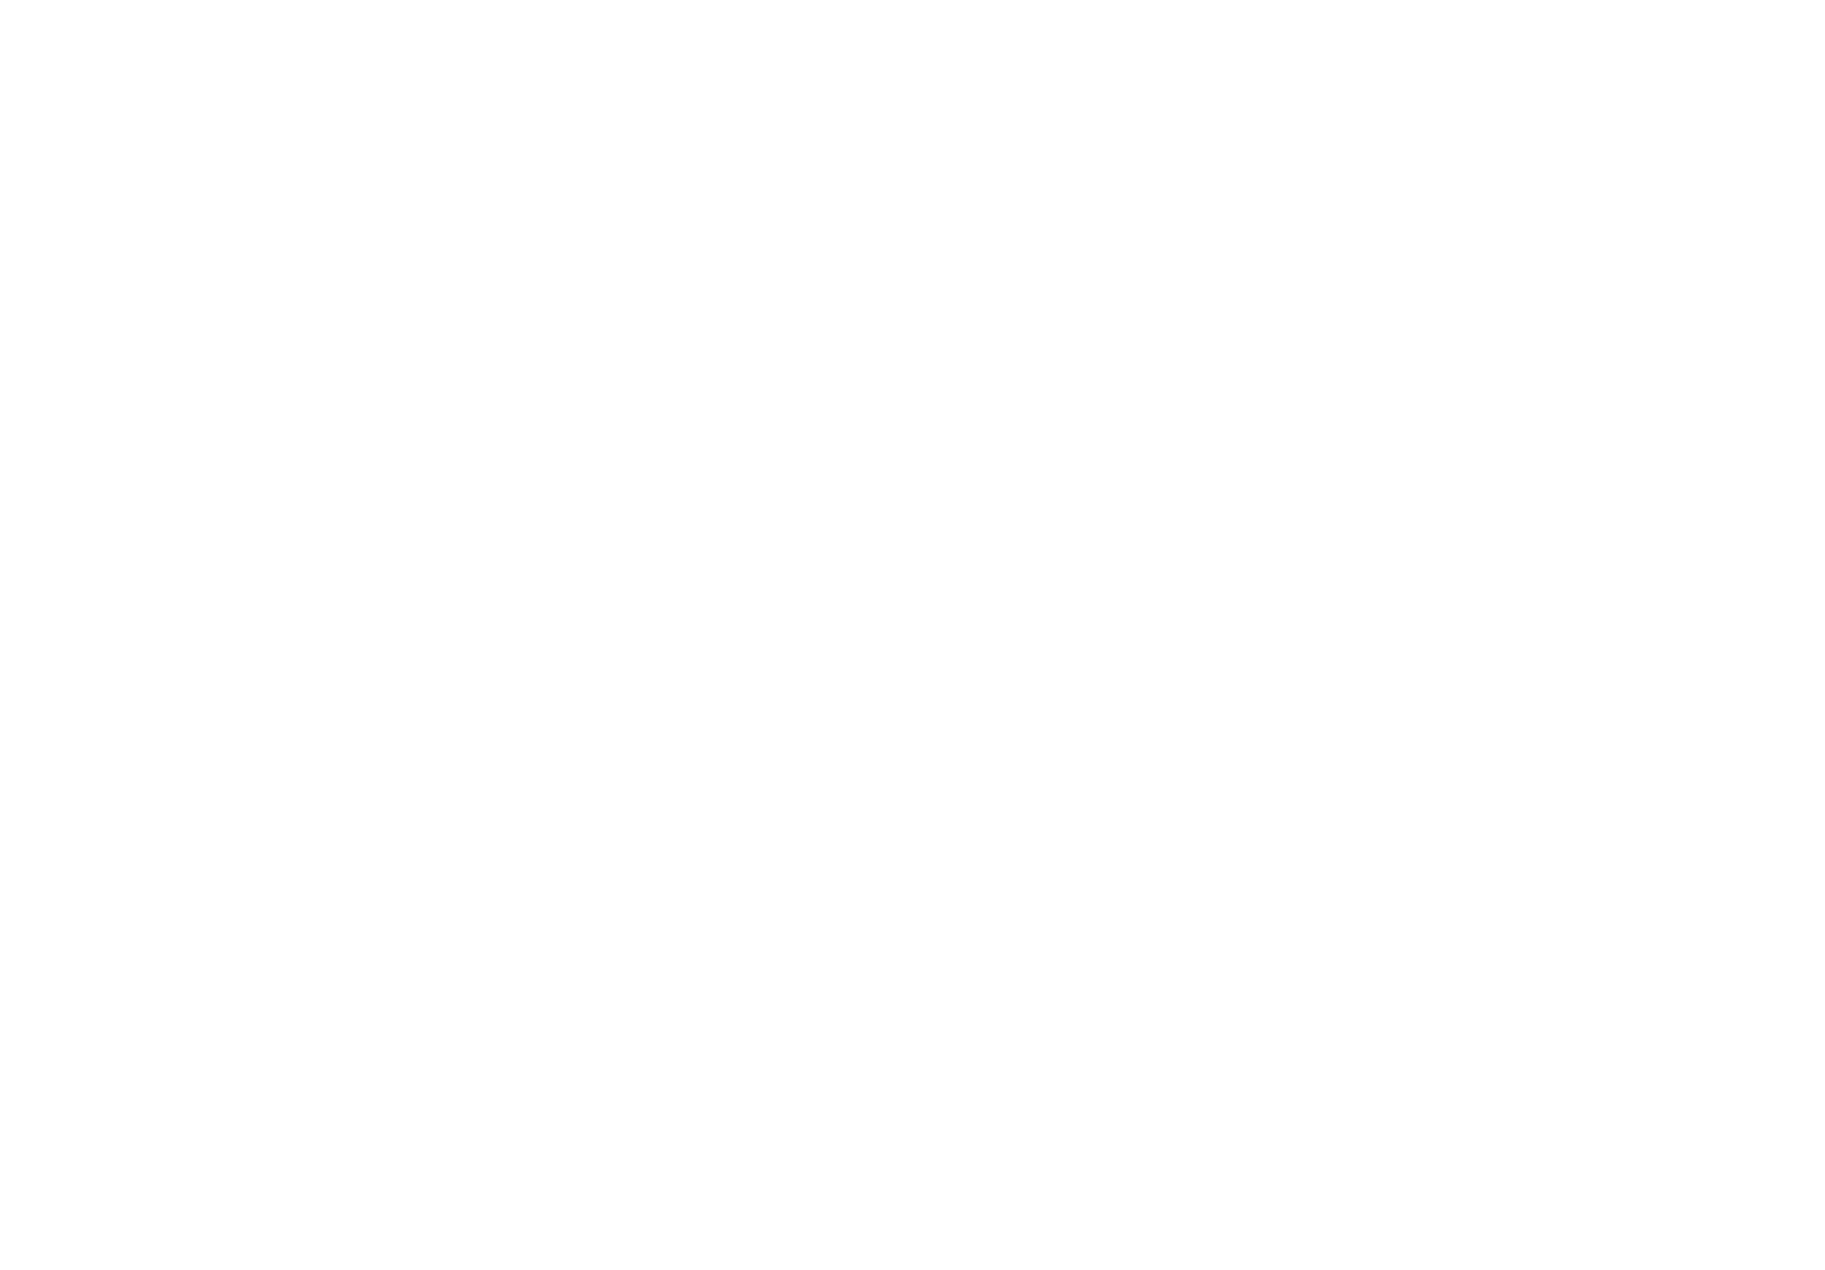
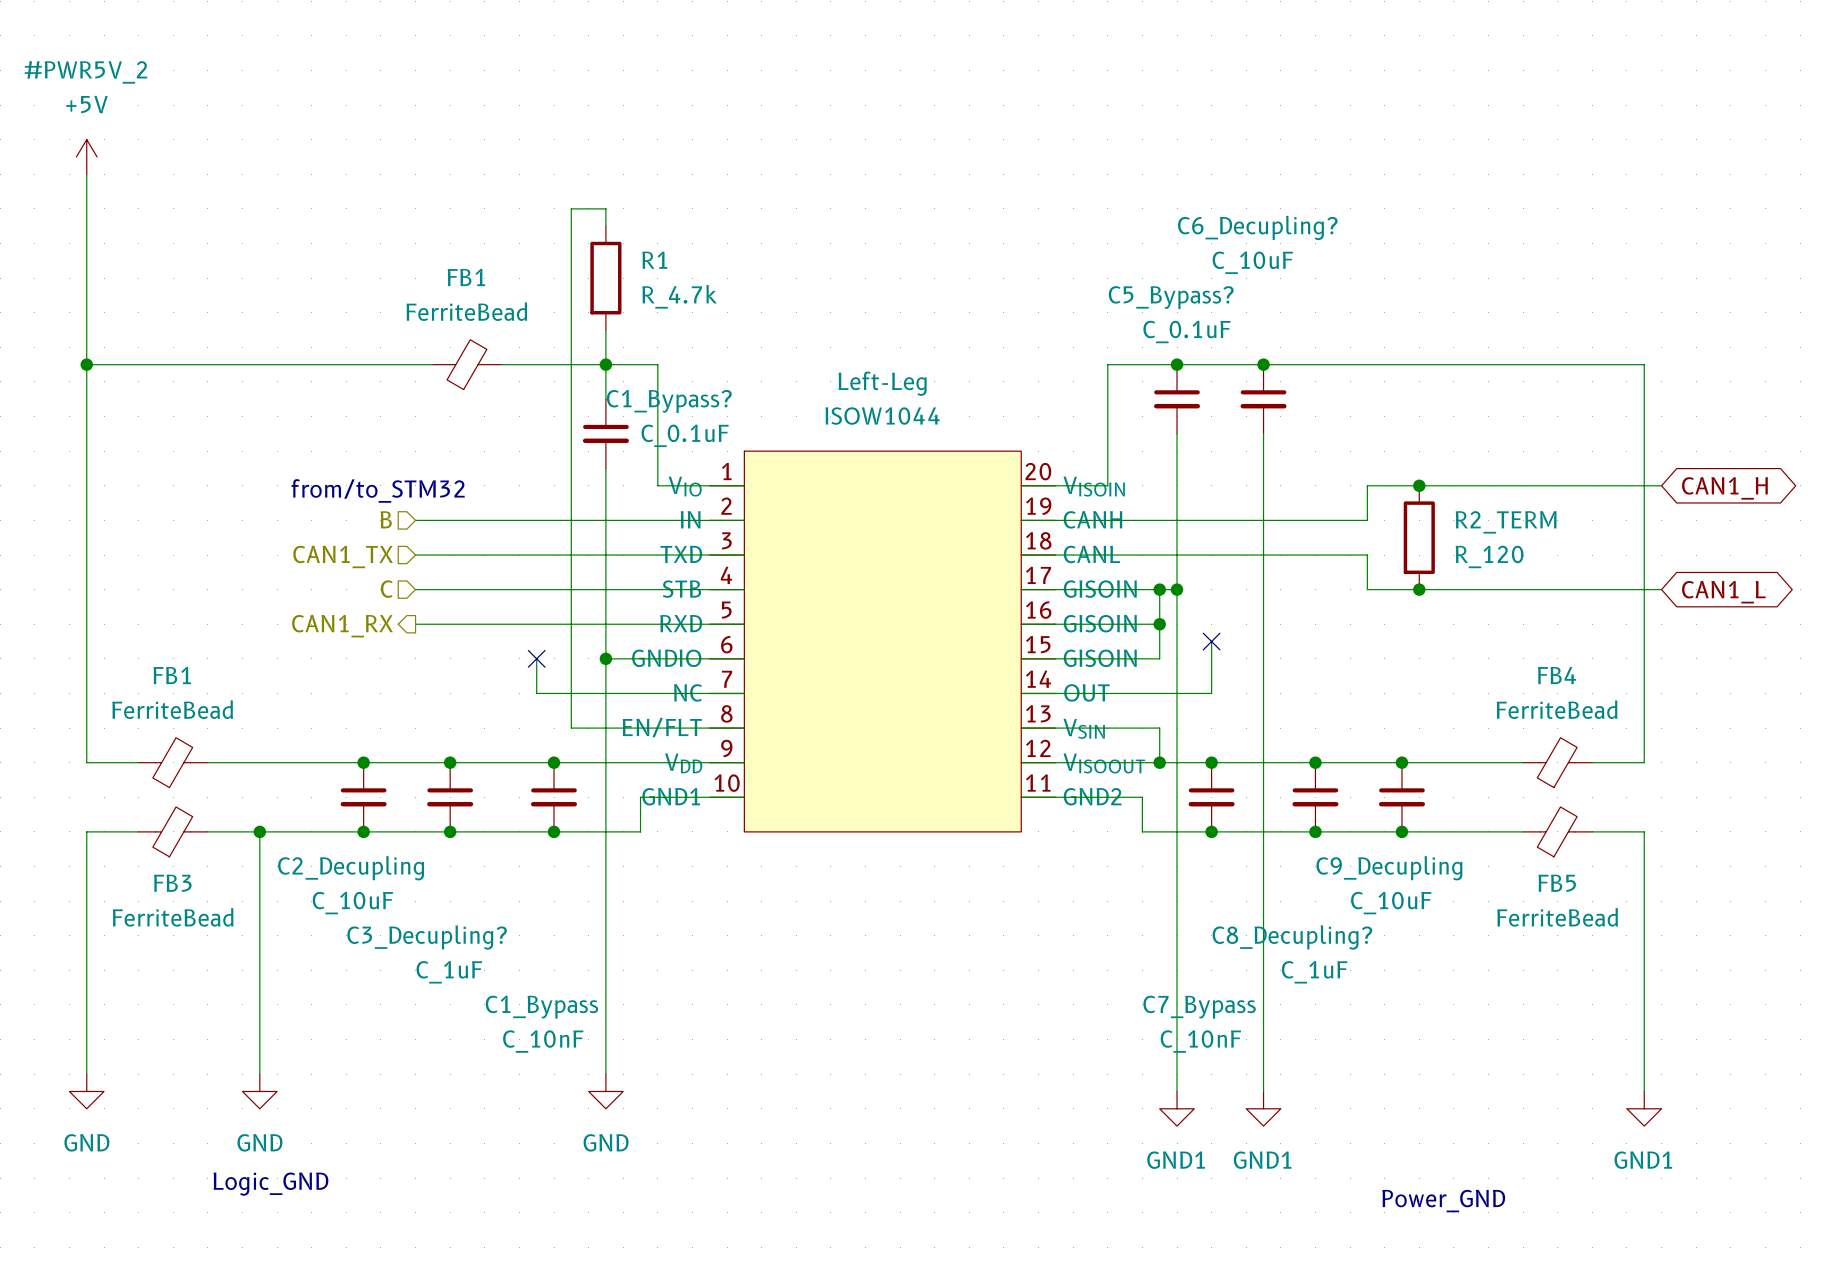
#PWR5V_2: none -> +5V (86, 156)
wire: none -> (86, 174) (86, 762) (138, 762)
wire: none -> (605, 226) (605, 208) (571, 208) (571, 728) (744, 728)
R1: none -> R_4.7k (605, 278)
wire: none -> (605, 330) (605, 399)
wire: none -> (86, 364) (432, 364)
junction: none -> (86, 364)
FB1: none -> FerriteBead (467, 364)
wire: none -> (502, 364) (657, 364) (657, 485) (744, 485)
junction: none -> (605, 364)
junction: none -> (1177, 364)
junction: none -> (1263, 364)
C5_Bypass?: none -> C_0.1uF (1177, 399)
C6_Decupling?: none -> C_10uF (1263, 399)
C1_Bypass?: none -> C_0.1uF (605, 433)
wire: none -> (1177, 433) (1177, 1091)
wire: none -> (1263, 433) (1263, 1091)
wire: none -> (605, 468) (605, 1074)
wire: none -> (1021, 485) (1107, 485) (1107, 364) (1644, 364) (1644, 762) (1592, 762)
junction: none -> (1419, 485)
wire: none -> (1661, 485) (1367, 485) (1367, 520) (1021, 520)
global label: none -> CAN1_H (1724, 488)
text: none -> from/to_STM32 (378, 490)
hierarchical label: none -> B (386, 519)
wire: none -> (415, 520) (744, 520)
R2_TERM: none -> R_120 (1419, 537)
hierarchical label: none -> CAN1_TX (343, 556)
wire: none -> (415, 555) (744, 555)
wire: none -> (1021, 555) (1367, 555) (1367, 589) (1661, 589)
hierarchical label: none -> C (386, 589)
wire: none -> (415, 589) (744, 589)
wire: none -> (1021, 589) (1177, 589)
wire: none -> (1159, 589) (1159, 658) (1021, 658)
junction: none -> (1159, 589)
junction: none -> (1177, 589)
junction: none -> (1419, 589)
global label: none -> CAN1_L (1723, 592)
hierarchical label: none -> CAN1_RX (342, 626)
wire: none -> (415, 624) (744, 624)
wire: none -> (1021, 624) (1159, 624)
junction: none -> (1159, 624)
Left-Leg: none -> ISOW1044 (882, 641)
wire: none -> (1211, 641) (1211, 693) (1021, 693)
no-connect mark: none -> (1211, 641)
wire: none -> (536, 658) (536, 693) (744, 693)
no-connect mark: none -> (536, 658)
wire: none -> (605, 658) (744, 658)
junction: none -> (605, 658)
wire: none -> (1021, 728) (1159, 728) (1159, 762)
FB1: none -> FerriteBead (173, 762)
wire: none -> (207, 762) (744, 762)
junction: none -> (363, 762)
junction: none -> (450, 762)
junction: none -> (554, 762)
wire: none -> (1021, 762) (1523, 762)
junction: none -> (1159, 762)
junction: none -> (1211, 762)
junction: none -> (1315, 762)
junction: none -> (1401, 762)
FB4: none -> FerriteBead (1557, 762)
C2_Decupling: none -> C_10uF (363, 797)
C3_Decupling?: none -> C_1uF (450, 797)
C1_Bypass: none -> C_10nF (554, 797)
wire: none -> (744, 797) (640, 797) (640, 831) (207, 831)
wire: none -> (1021, 797) (1142, 797) (1142, 831) (1523, 831)
C7_Bypass: none -> C_10nF (1211, 797)
C8_Decupling?: none -> C_1uF (1315, 797)
C9_Decupling: none -> C_10uF (1401, 797)
wire: none -> (138, 831) (86, 831) (86, 1074)
FB3: none -> FerriteBead (173, 831)
wire: none -> (259, 831) (259, 1074)
junction: none -> (259, 831)
junction: none -> (363, 831)
junction: none -> (450, 831)
junction: none -> (554, 831)
junction: none -> (1211, 831)
junction: none -> (1315, 831)
junction: none -> (1401, 831)
FB5: none -> FerriteBead (1557, 831)
wire: none -> (1592, 831) (1644, 831) (1644, 1091)
power symbol: none -> GND (86, 1091)
power symbol: none -> GND (259, 1091)
power symbol: none -> GND (605, 1091)
power symbol: none -> GND1 (1177, 1108)
power symbol: none -> GND1 (1263, 1108)
power symbol: none -> GND1 (1644, 1108)
text: none -> Logic_GND (270, 1184)
text: none -> Power_GND (1443, 1201)

